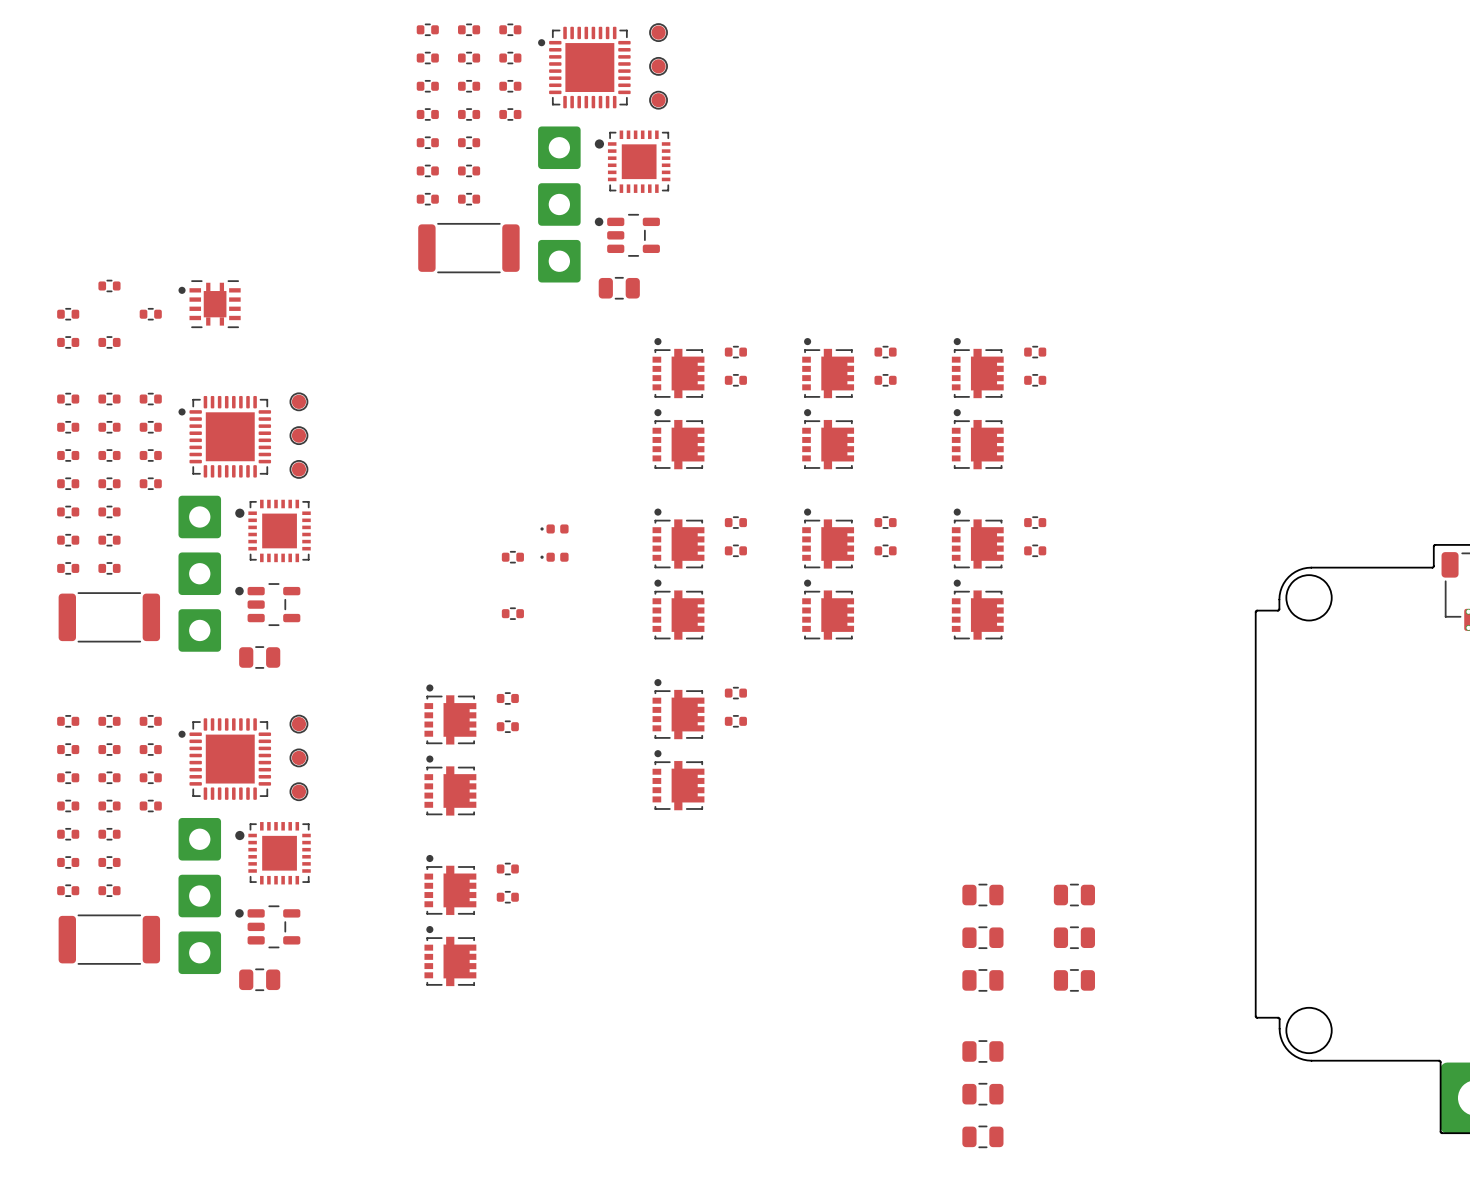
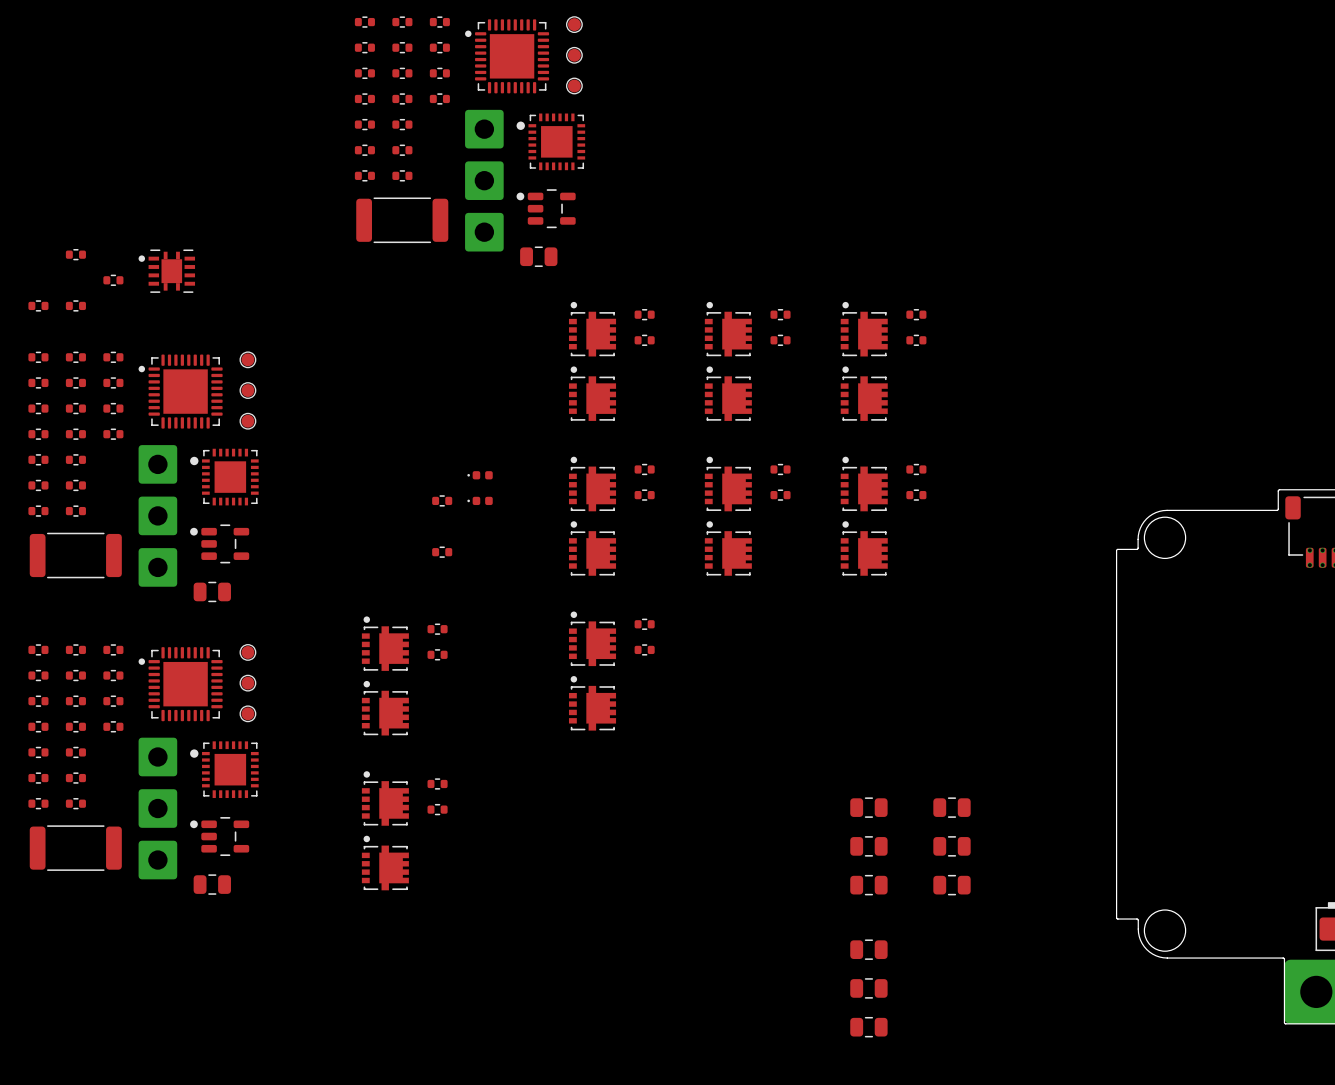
part: (68, 314) -> none

